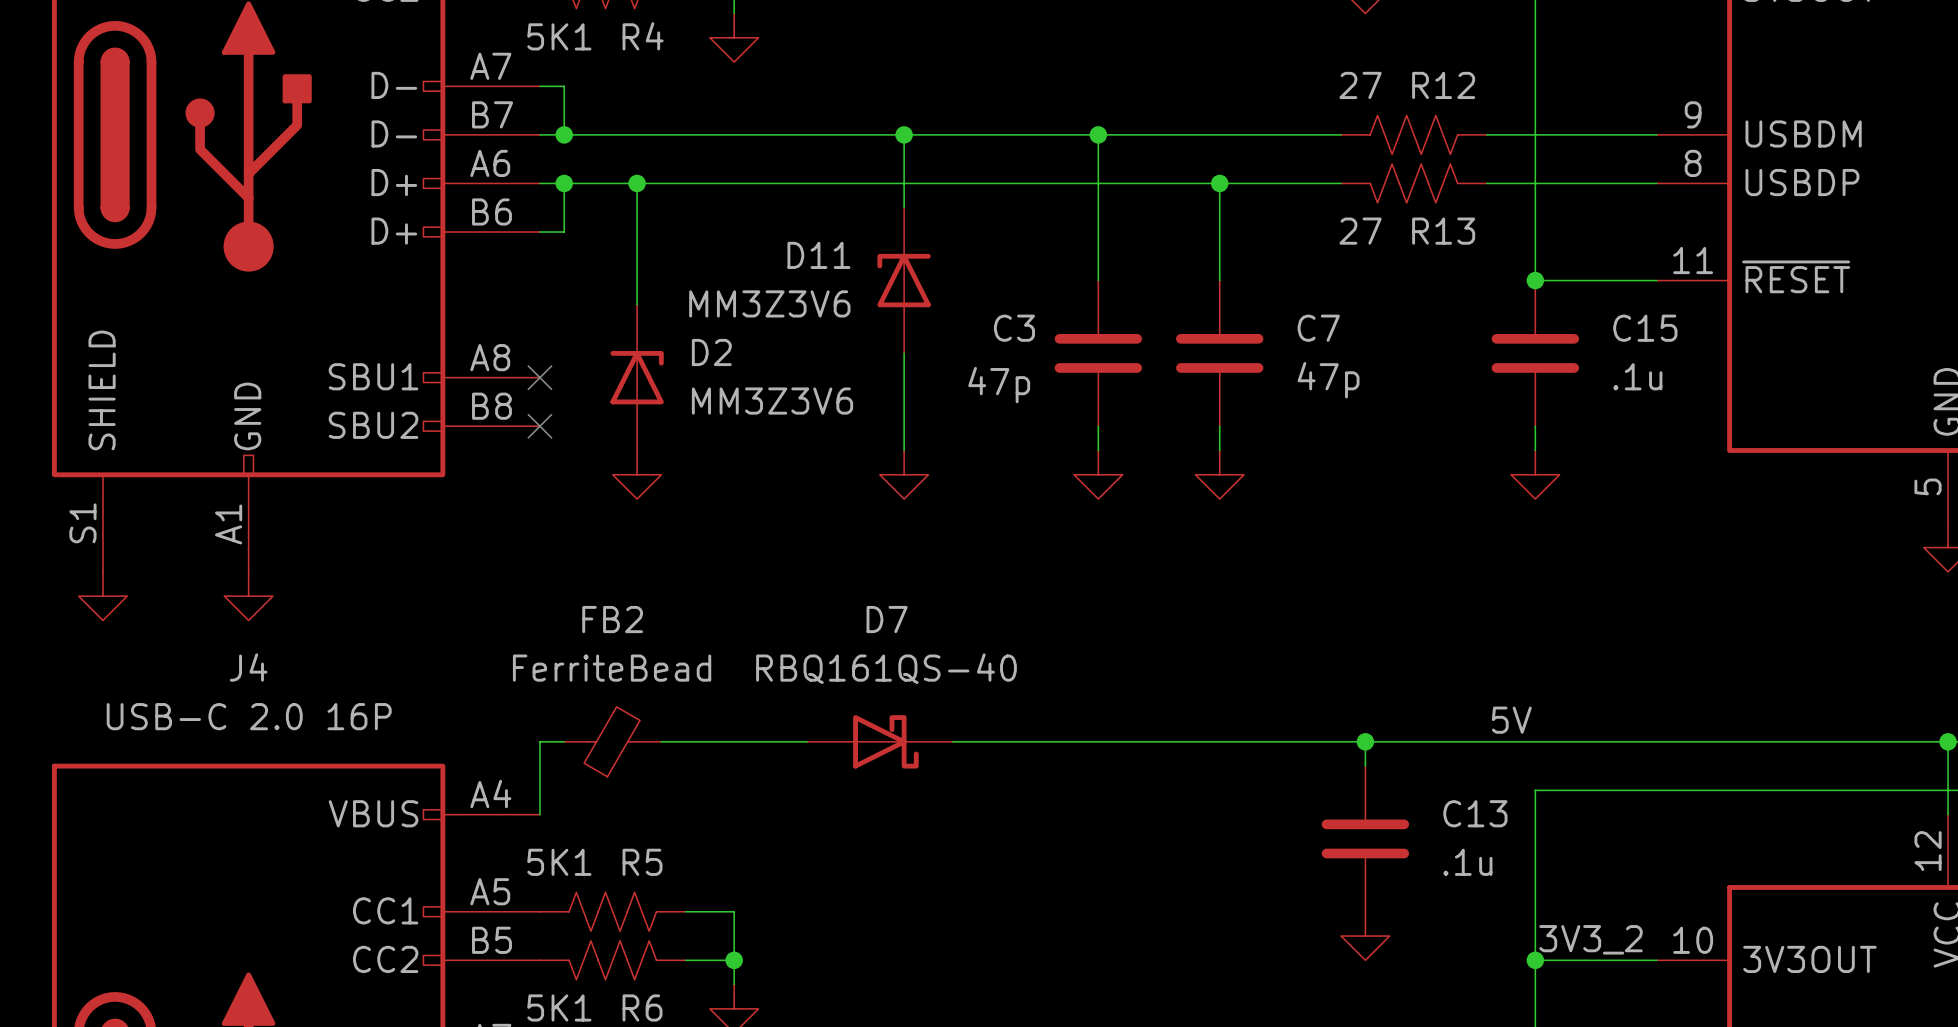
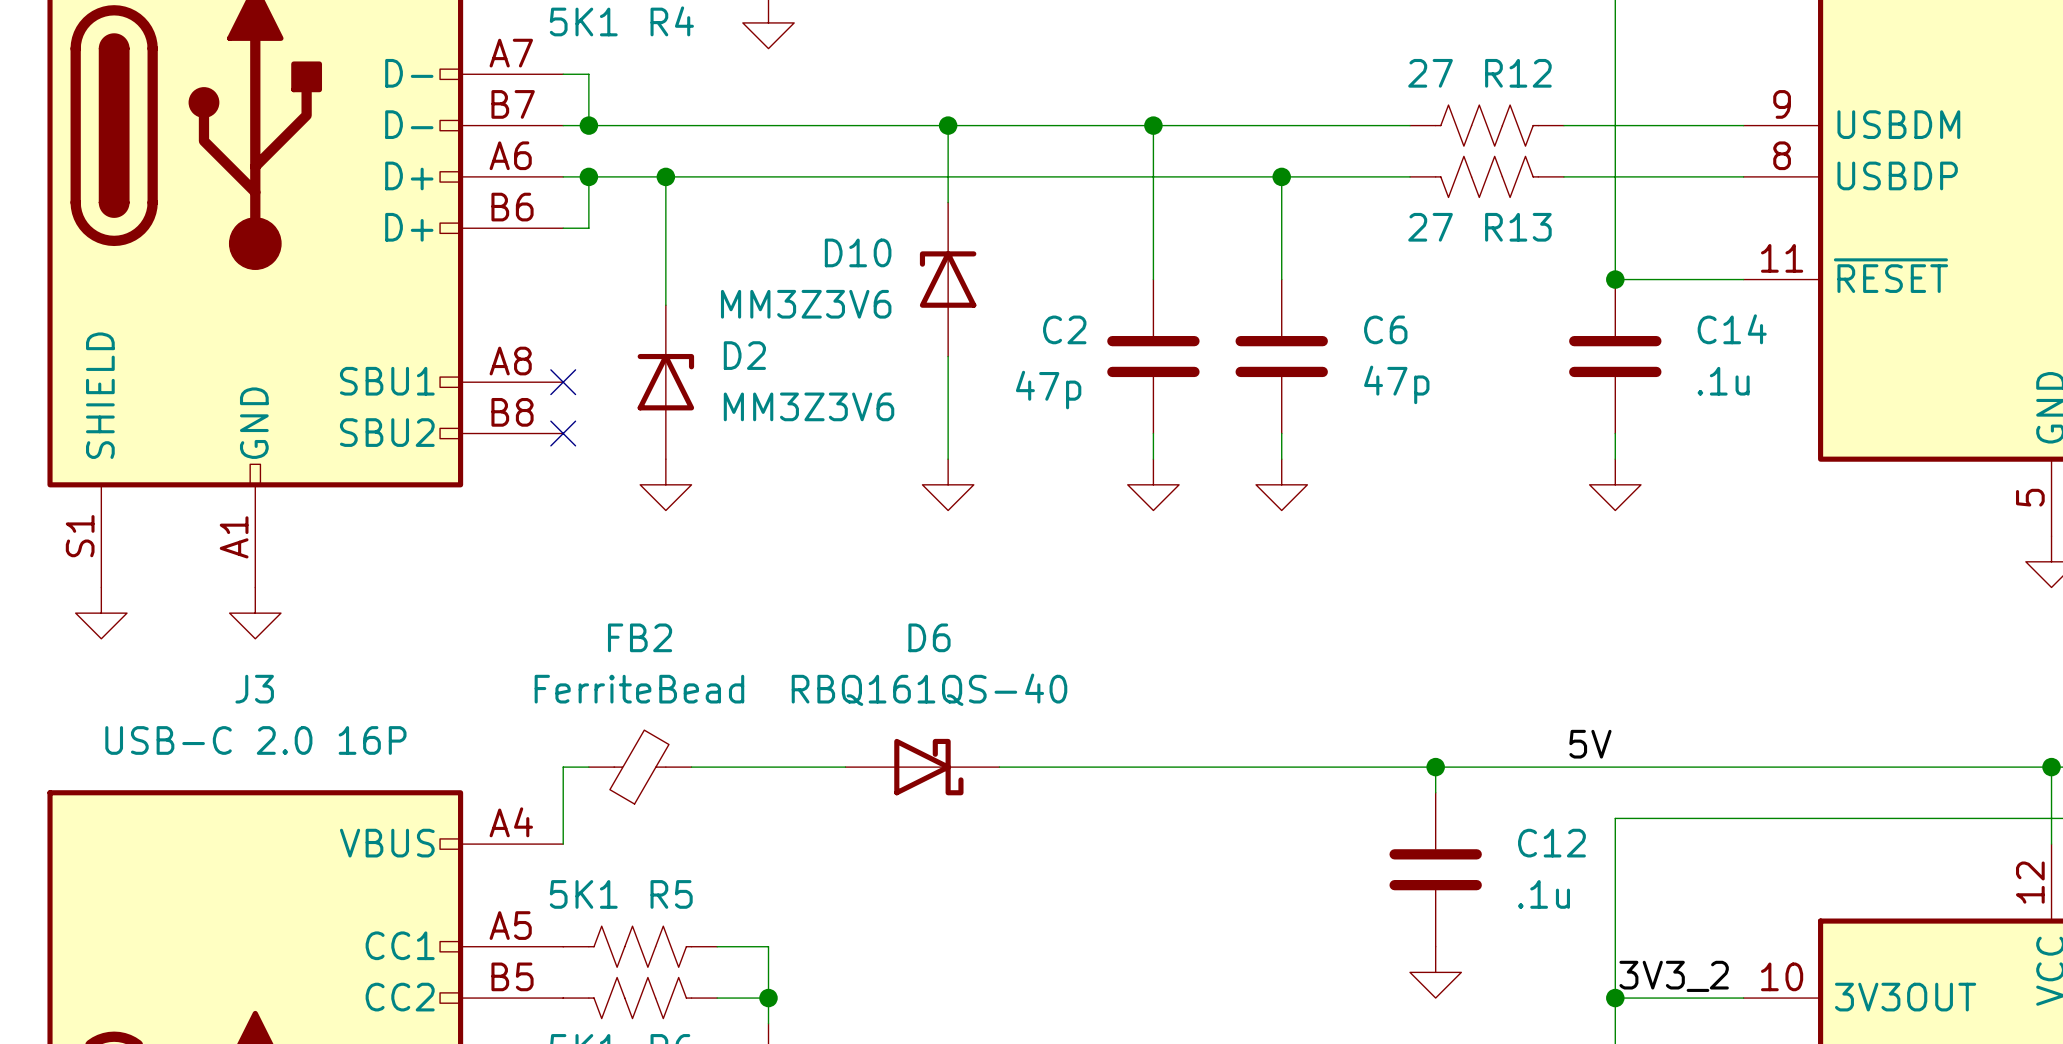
D11 name: D11 (818, 255) -> D10 (858, 252)
C3 name: C3 (1014, 328) -> C2 (1064, 329)
C7 name: C7 (1318, 328) -> C6 (1385, 329)
C15 name: C15 (1645, 328) -> C14 (1732, 329)
D7 name: D7 (887, 619) -> D6 (929, 637)
J4 name: J4 (248, 667) -> J3 (254, 689)
C13 name: C13 (1475, 813) -> C12 (1551, 843)

